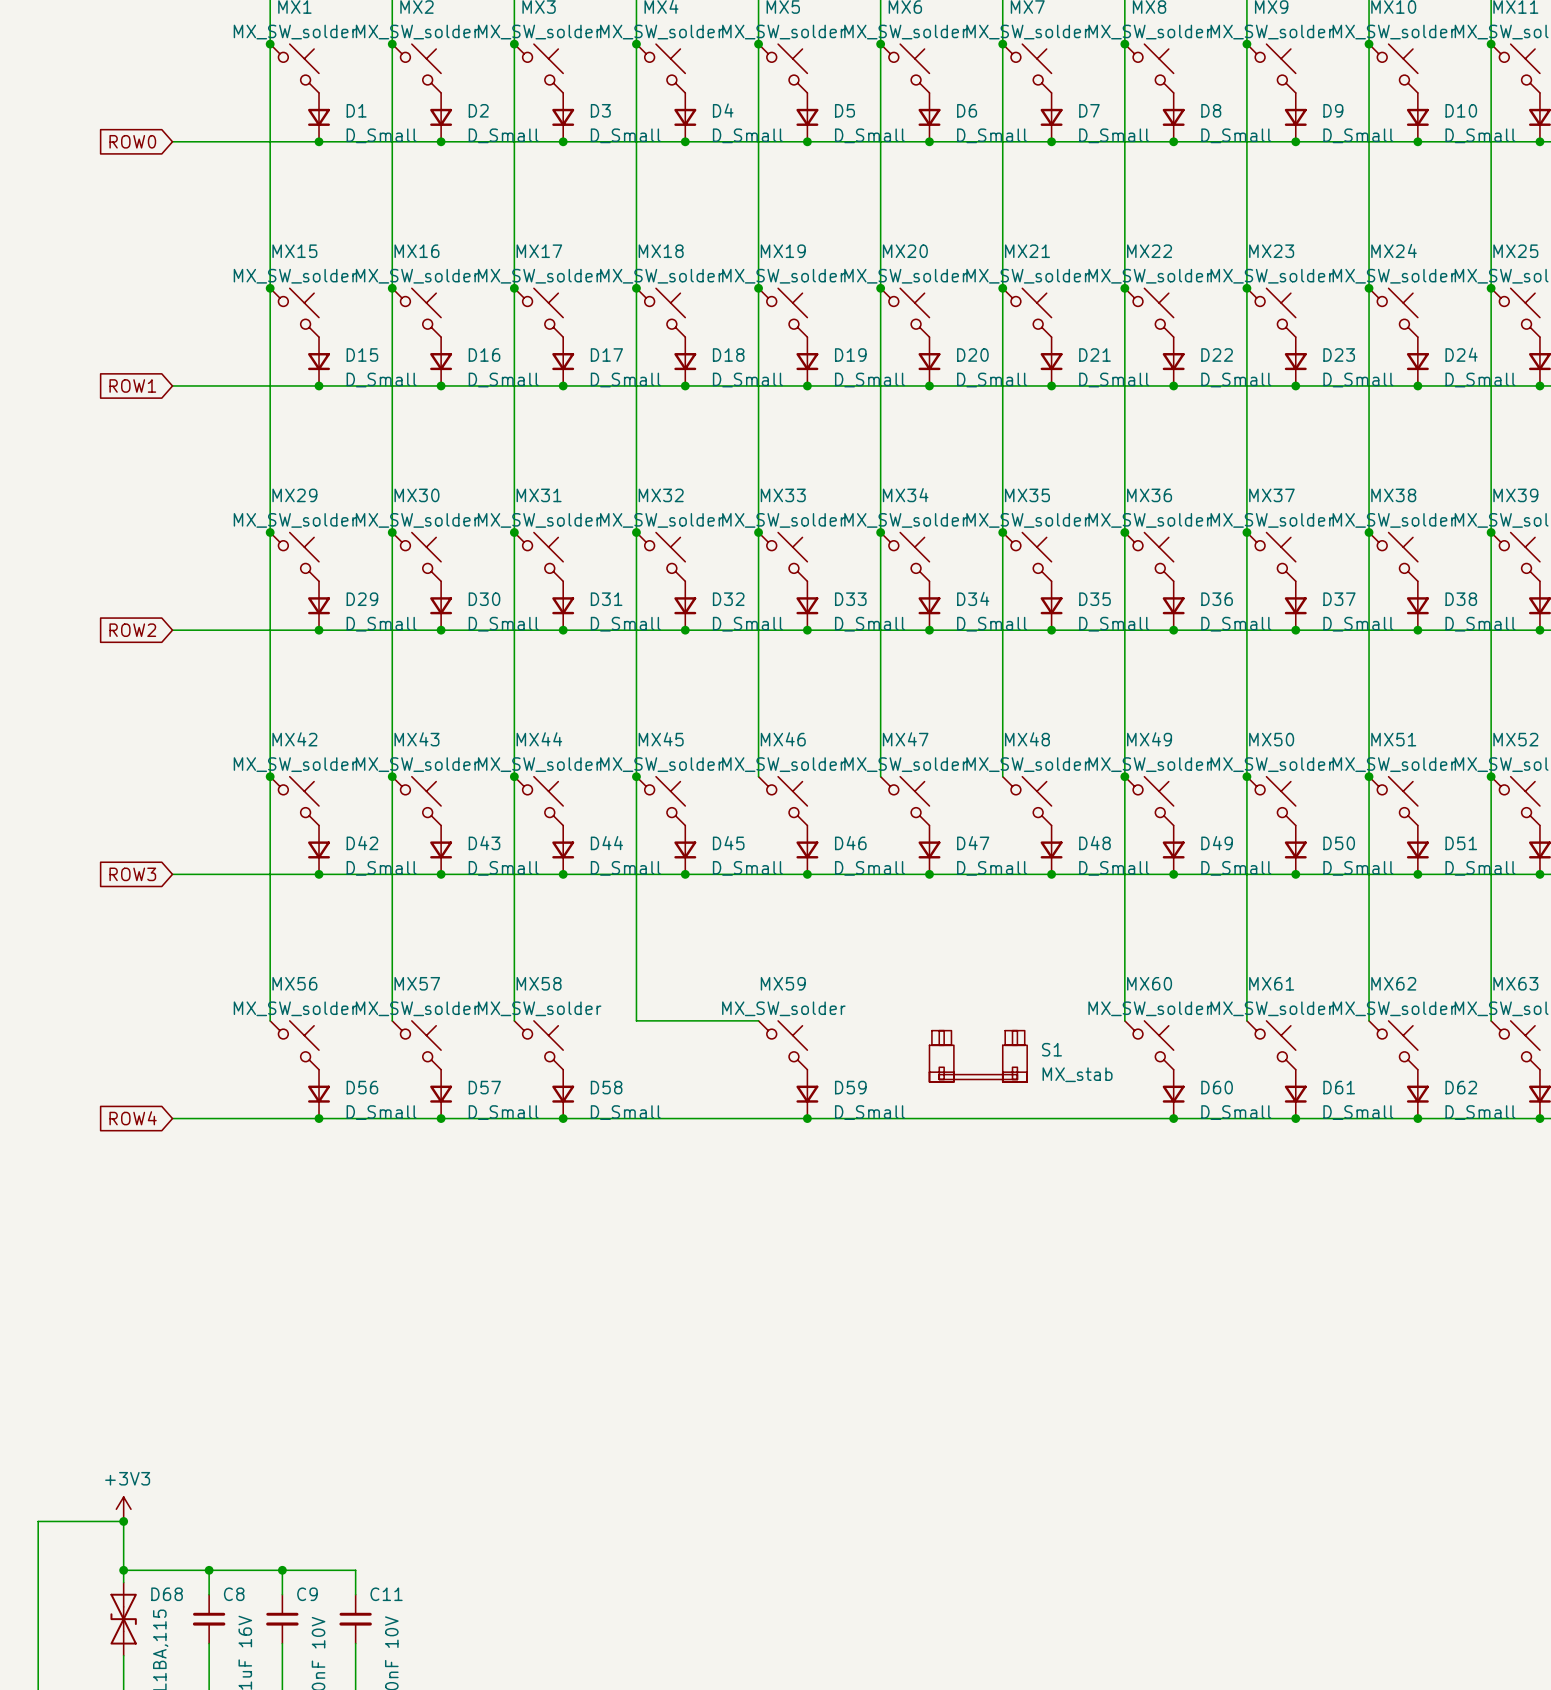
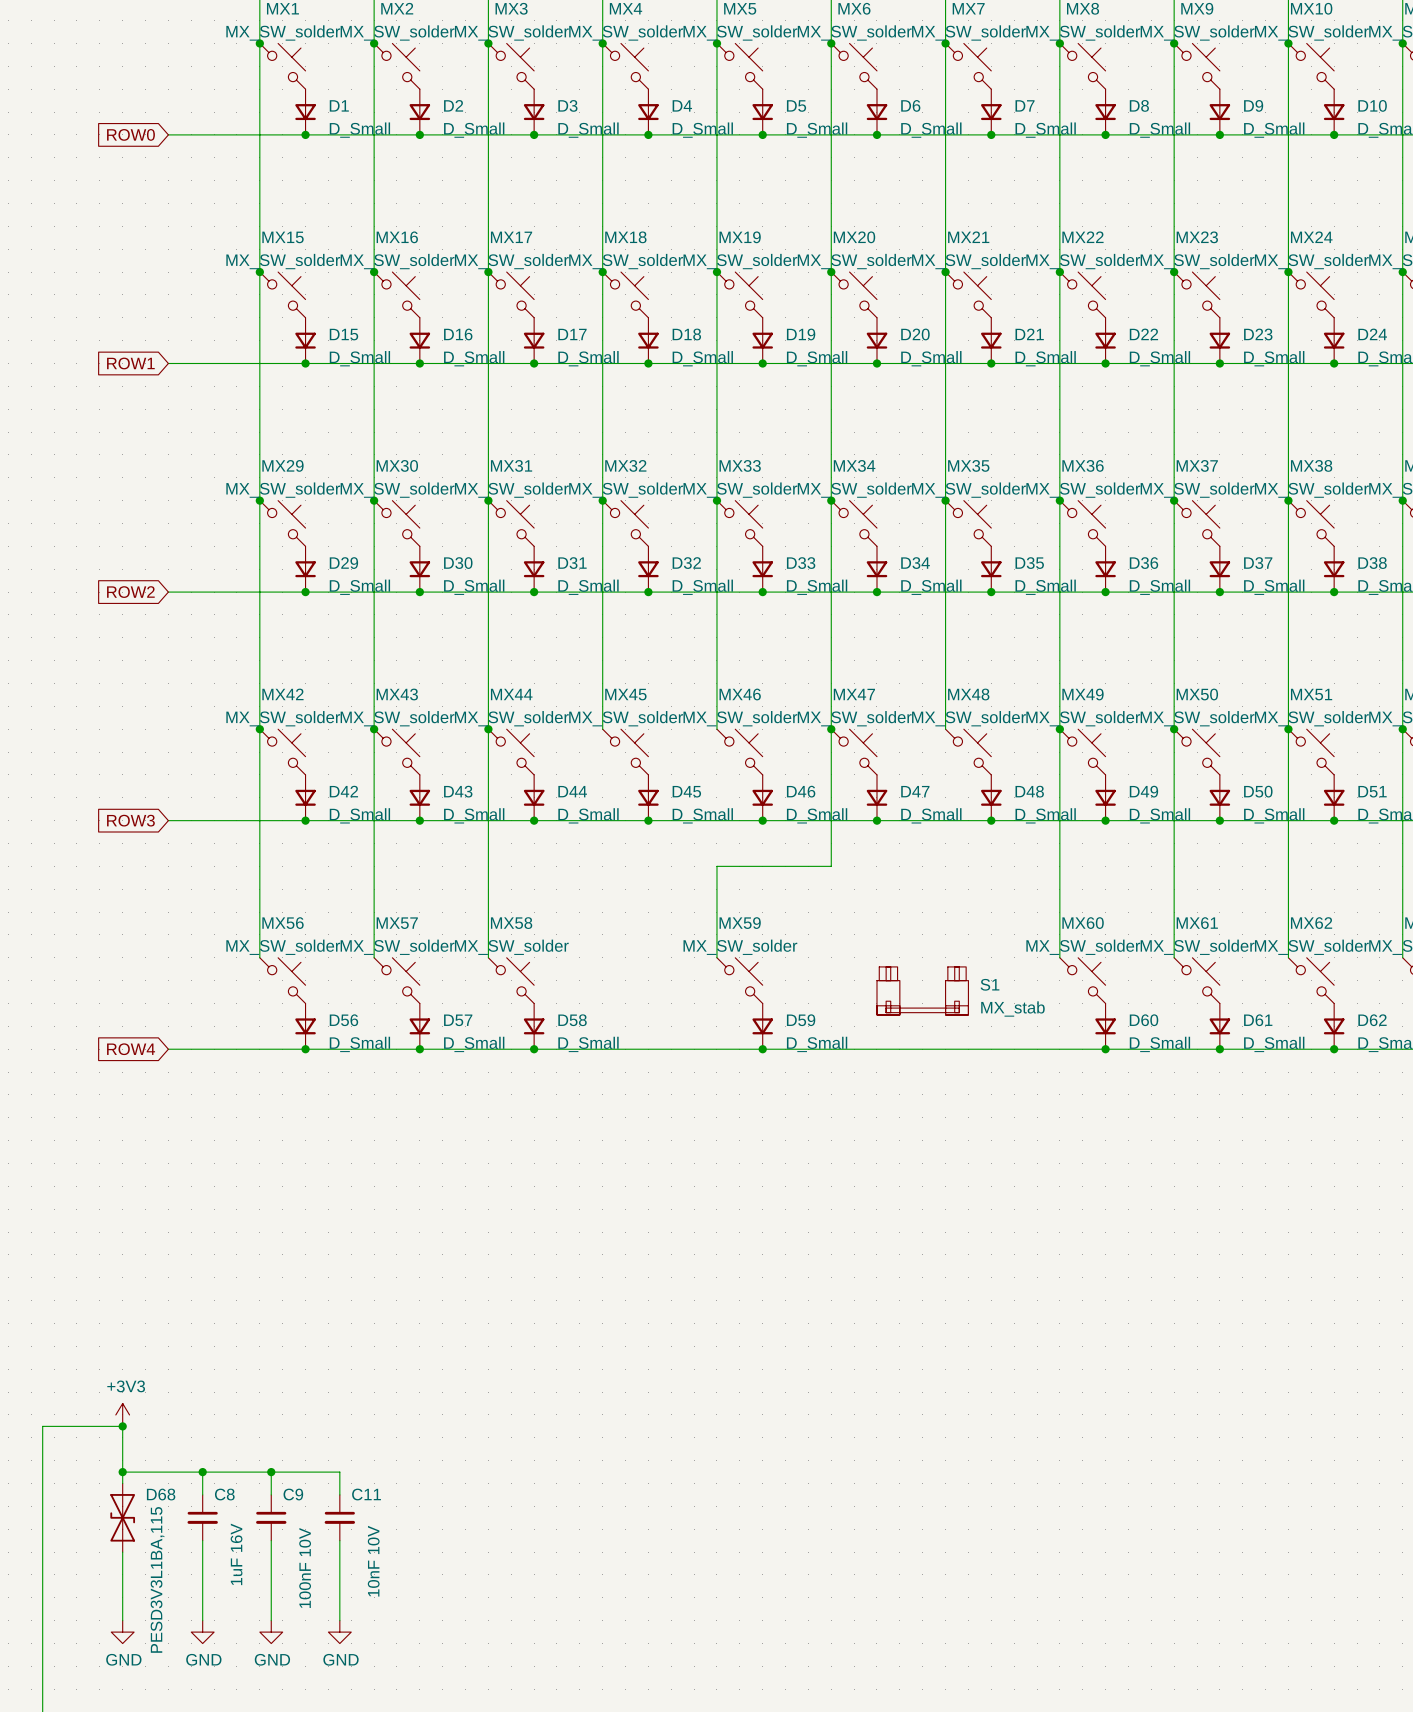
wire: (636, 776) (636, 1020) (758, 1020) -> (831, 729) (831, 866) (716, 866) (716, 957)
junction: (636, 776) -> none
junction: none -> (831, 729)

